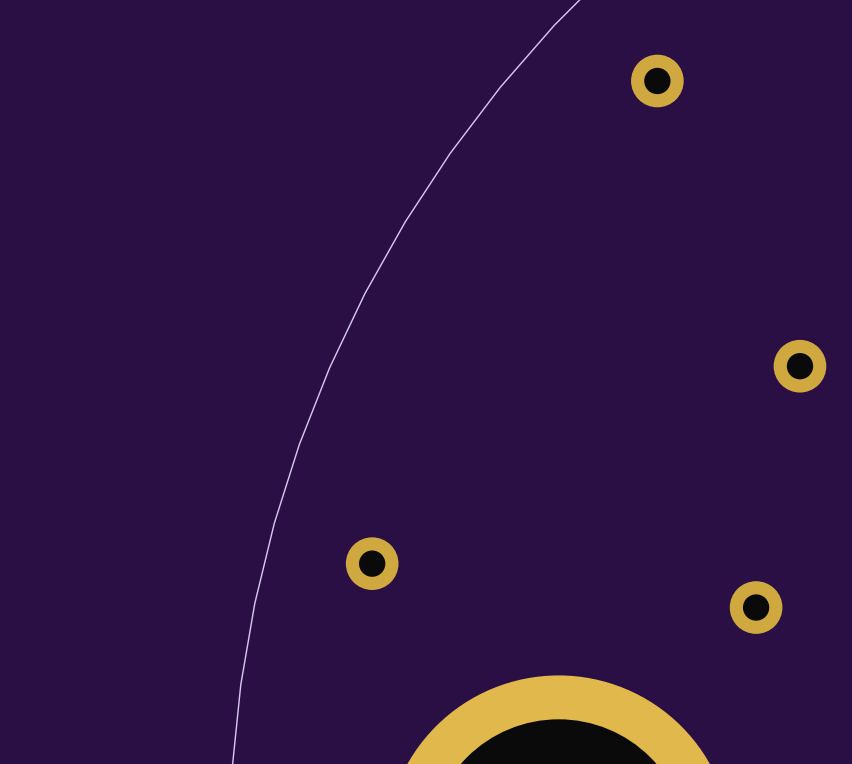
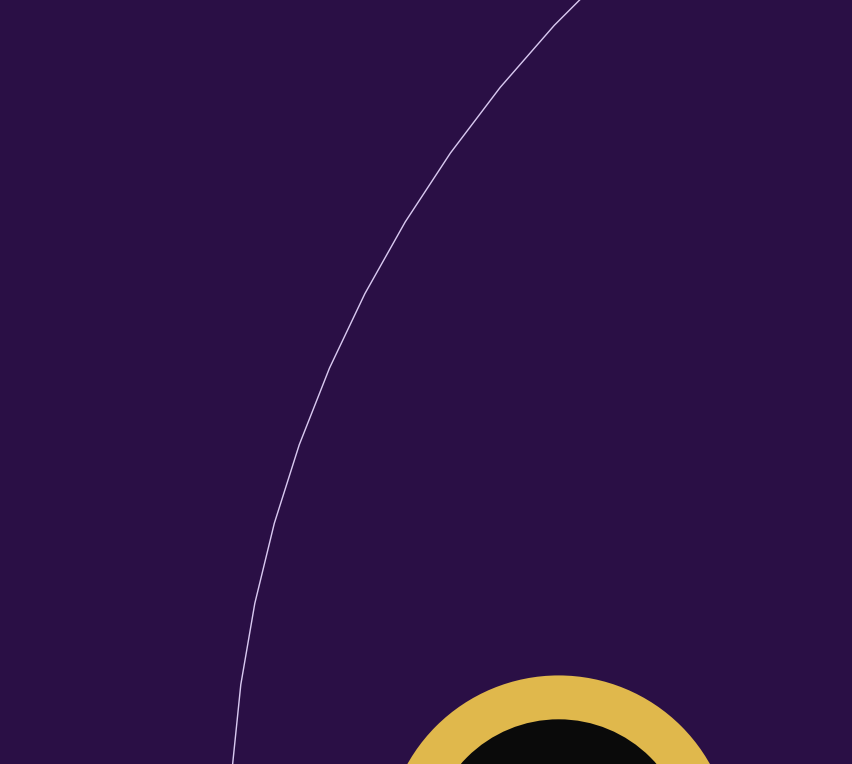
via: (657, 80) -> none
via: (799, 366) -> none
via: (372, 563) -> none
via: (756, 607) -> none

